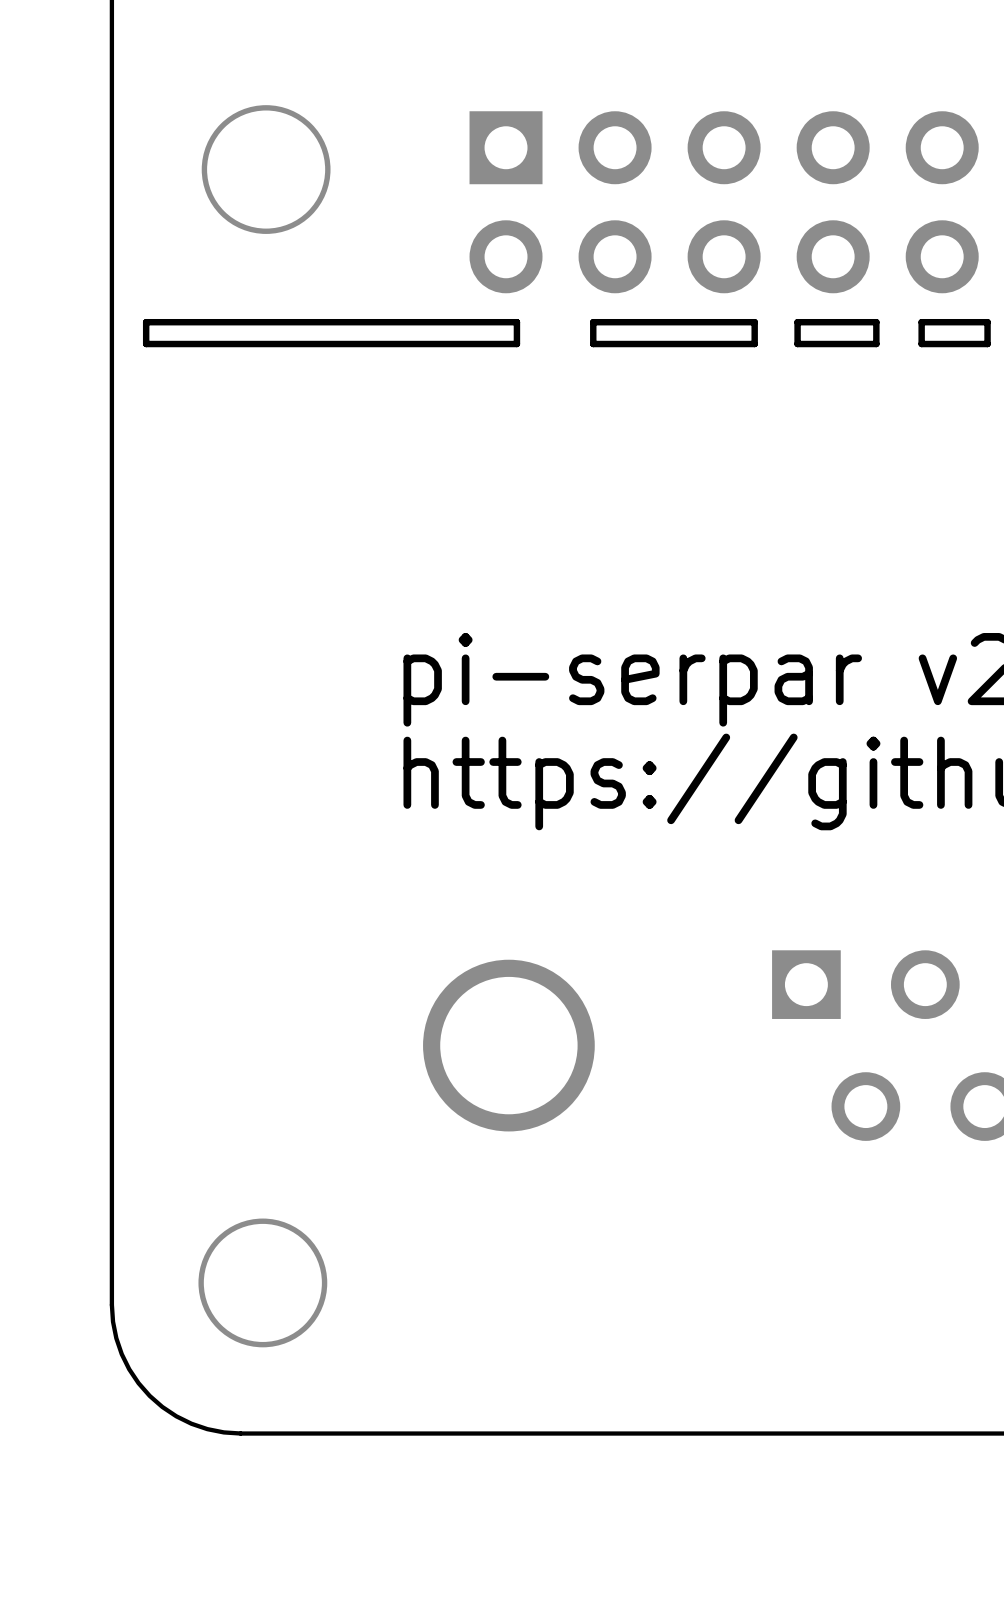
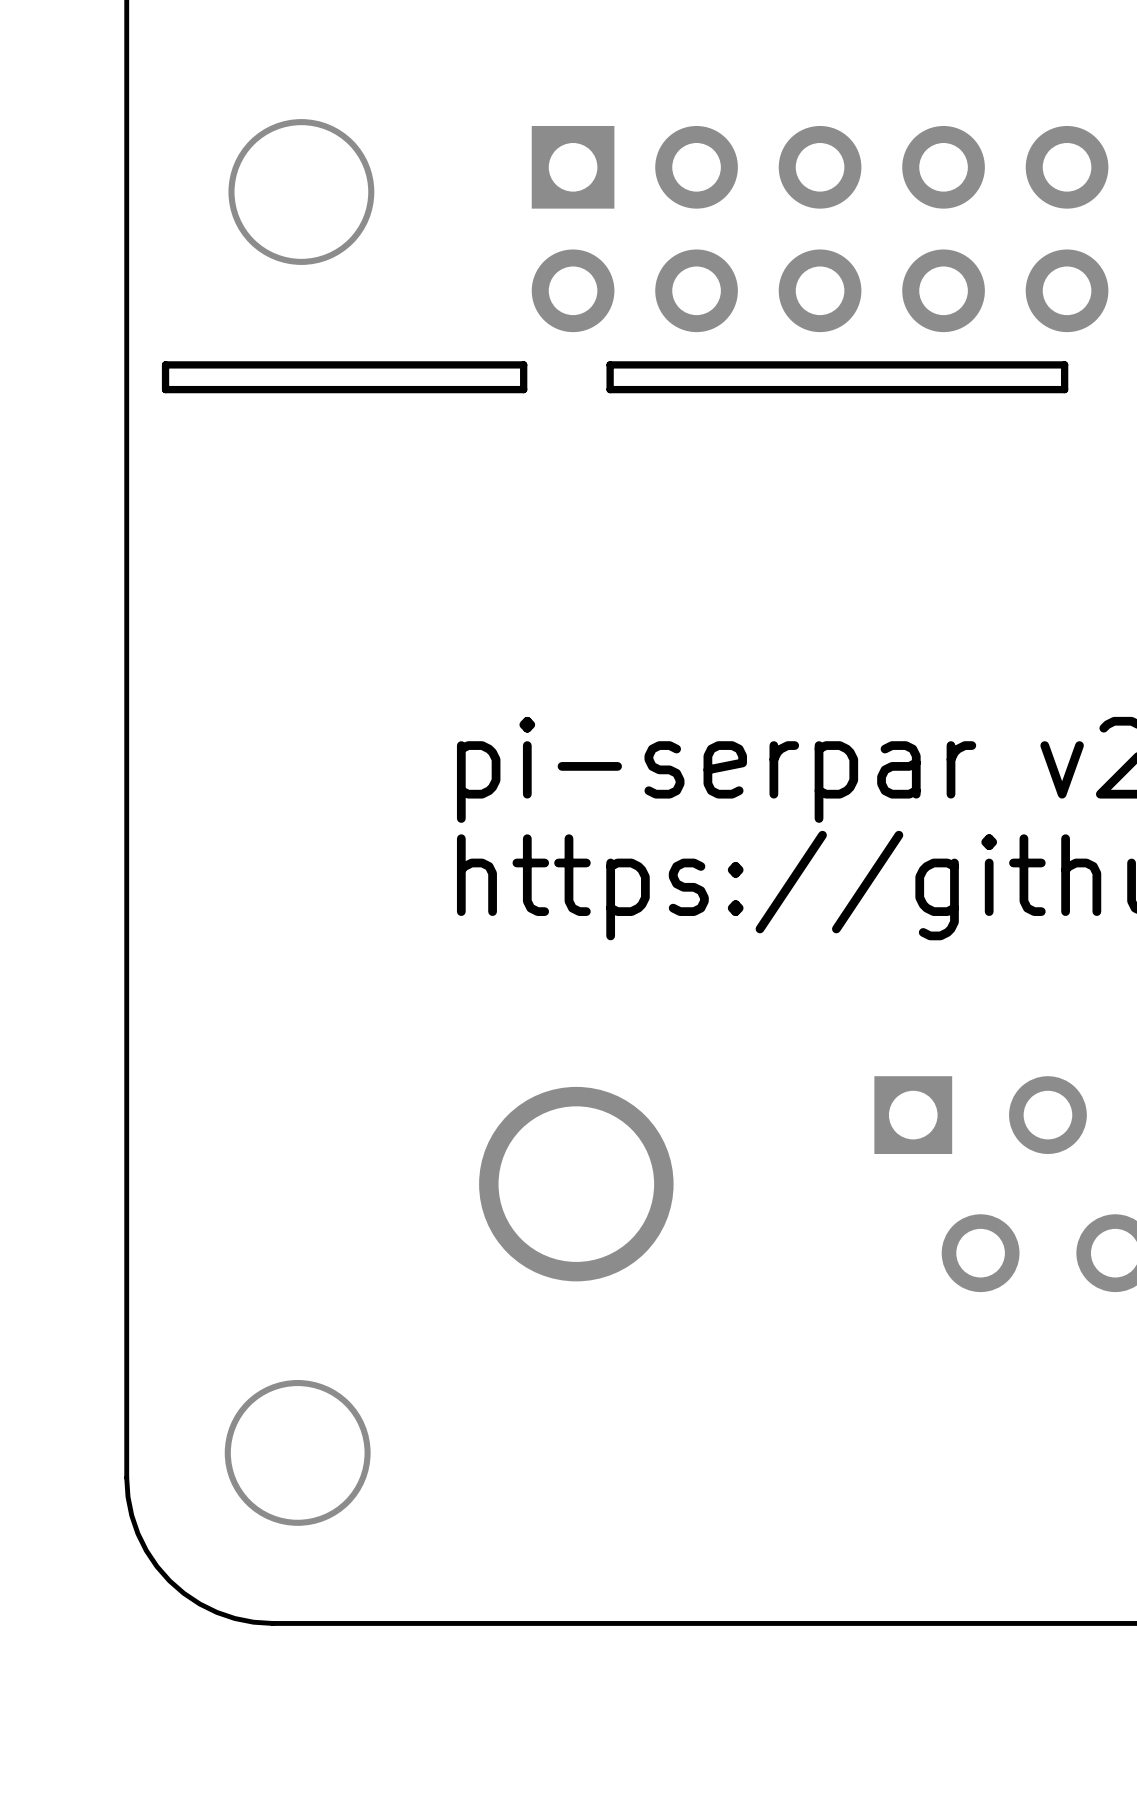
board edge: (462, 322) (516, 322) (516, 344) (462, 344) -> (523, 364) (523, 389)
board edge: (593, 322) (593, 344) -> (671, 364) (610, 364) (610, 389) (671, 389)
board edge: (754, 322) (754, 344) -> (903, 389) (854, 389)
board edge: (797, 322) (797, 344) -> (903, 364) (854, 364)
board edge: (876, 322) (876, 344) -> (1043, 389) (992, 389)
board edge: (921, 322) (921, 344) -> (1043, 364) (992, 364)
board edge: (940, 322) (987, 322) (987, 344) (940, 344) -> (1064, 364) (1064, 389)

